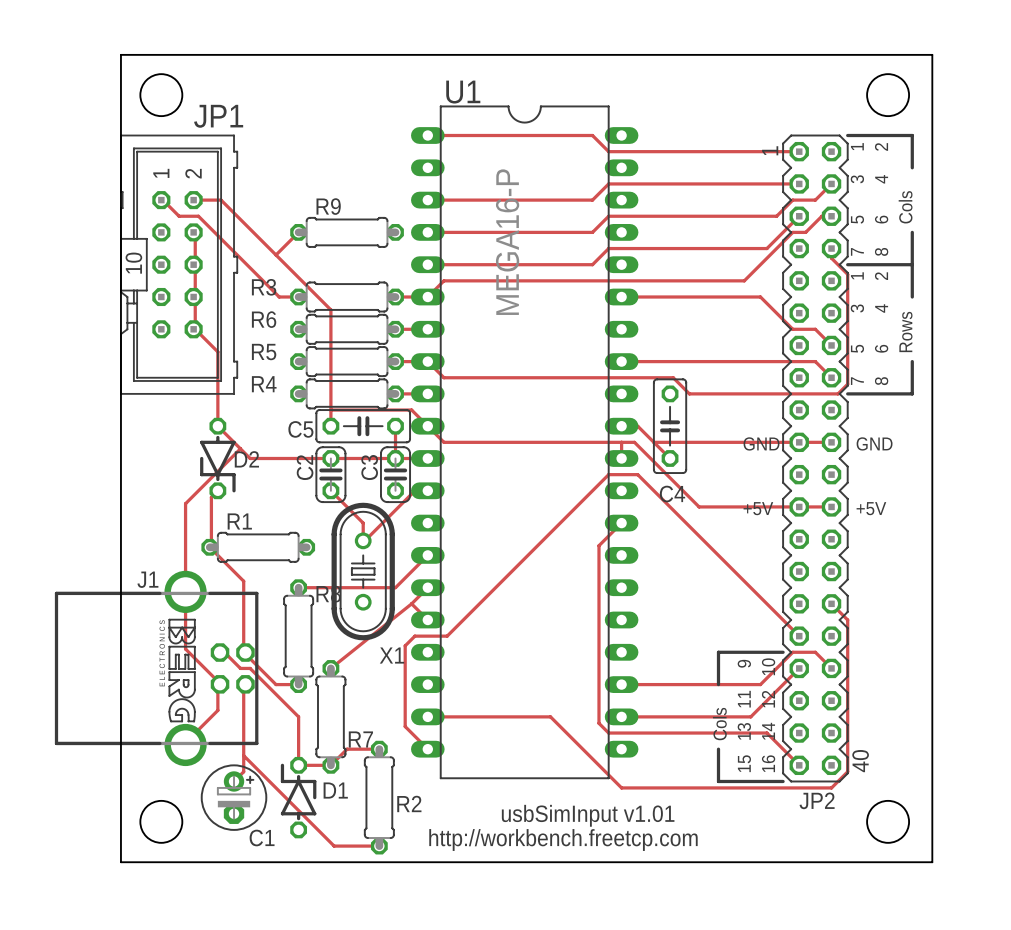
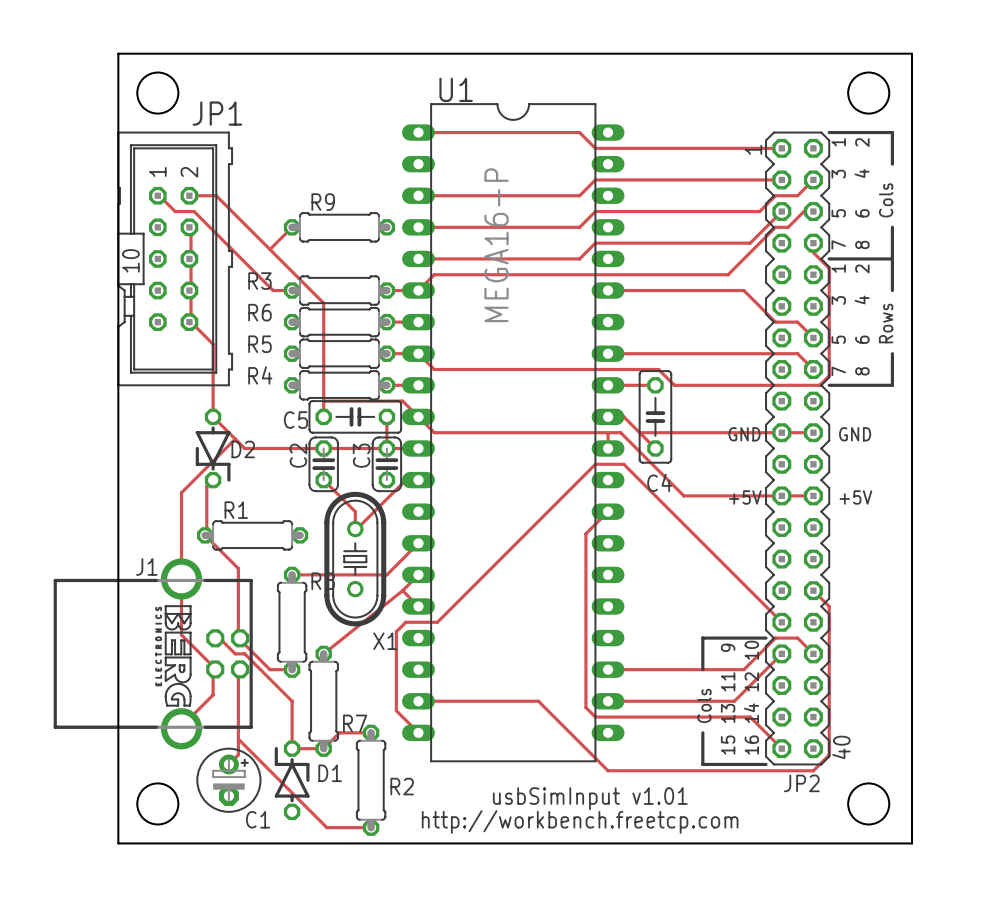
track: none -> (608, 385) (655, 385)

